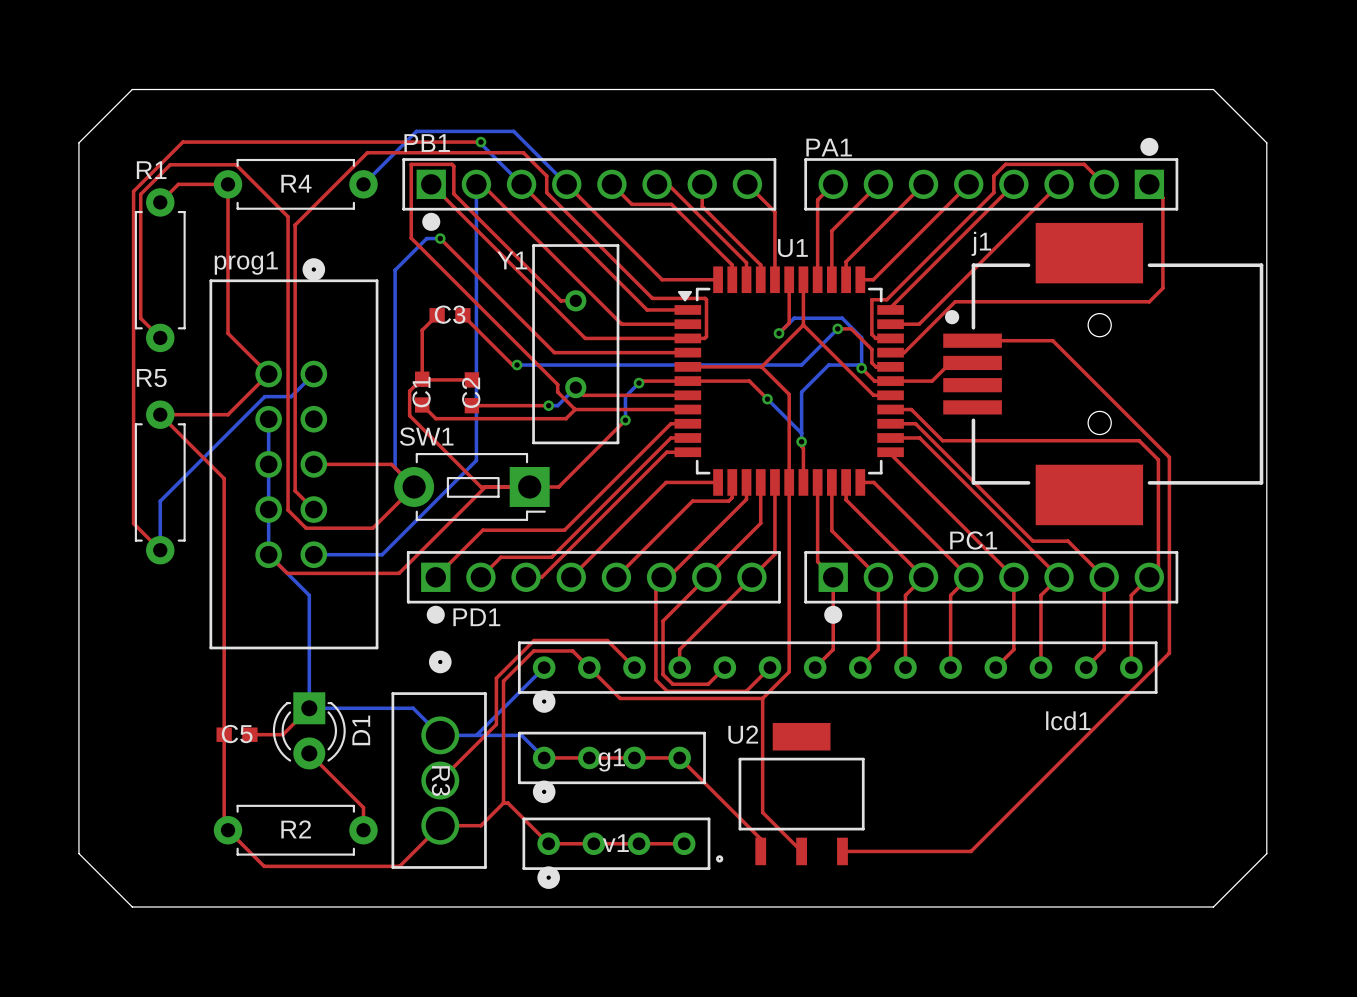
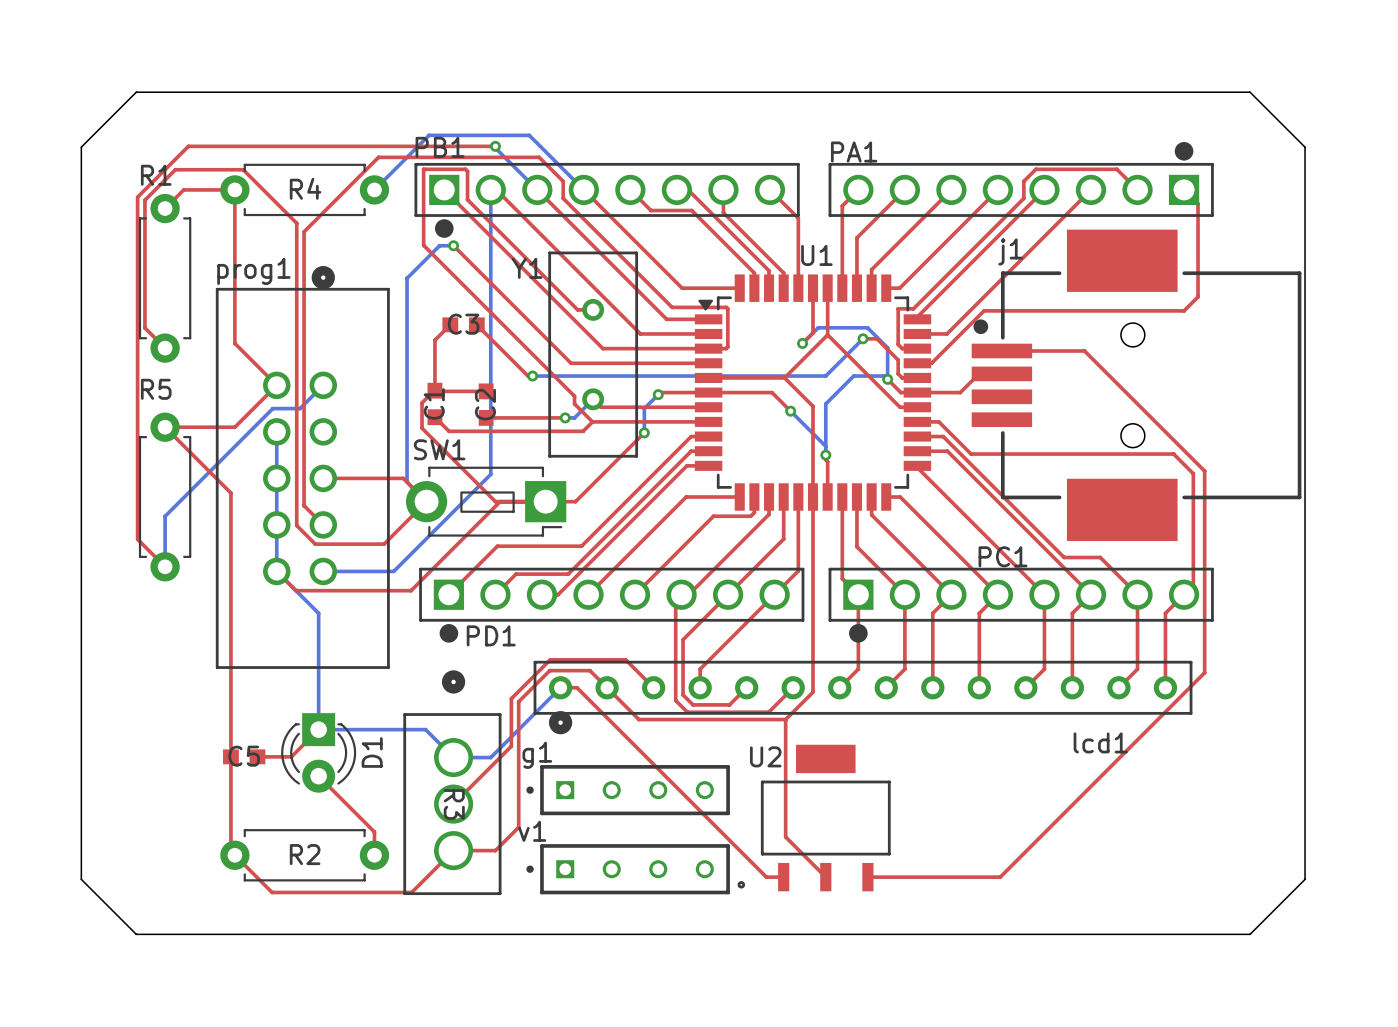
g1 footprint: [517, 731, 706, 804] -> [526, 765, 730, 816]
bottom track: (476, 735) (521, 735) (544, 757) -> none
top track: (544, 757) (679, 757) (760, 839) (760, 851) -> (560, 687) (577, 687) (766, 877) (783, 877)
g1 name position: g1 (611, 759) -> g1 (537, 755)
top track: (503, 803) (508, 803) (548, 843) (684, 843) -> none
v1 footprint: [522, 817, 711, 889] -> [526, 844, 730, 895]
v1 name position: v1 (615, 843) -> v1 (532, 831)

